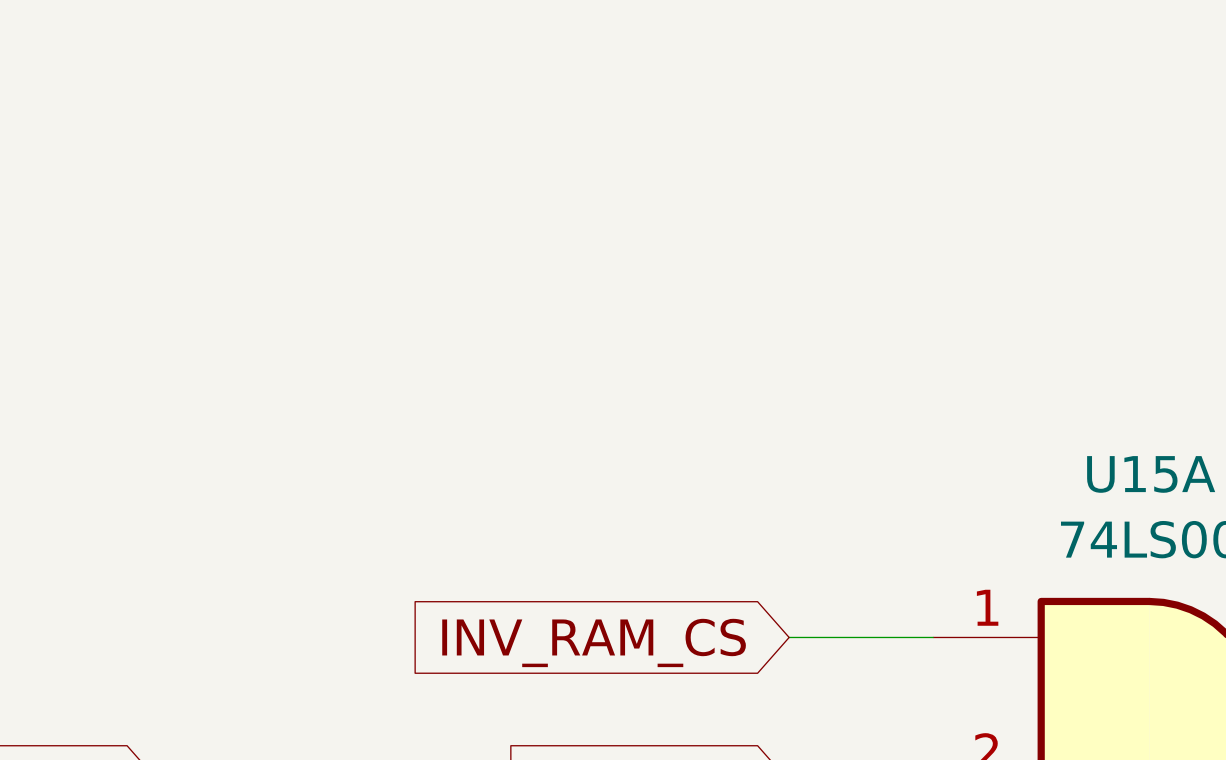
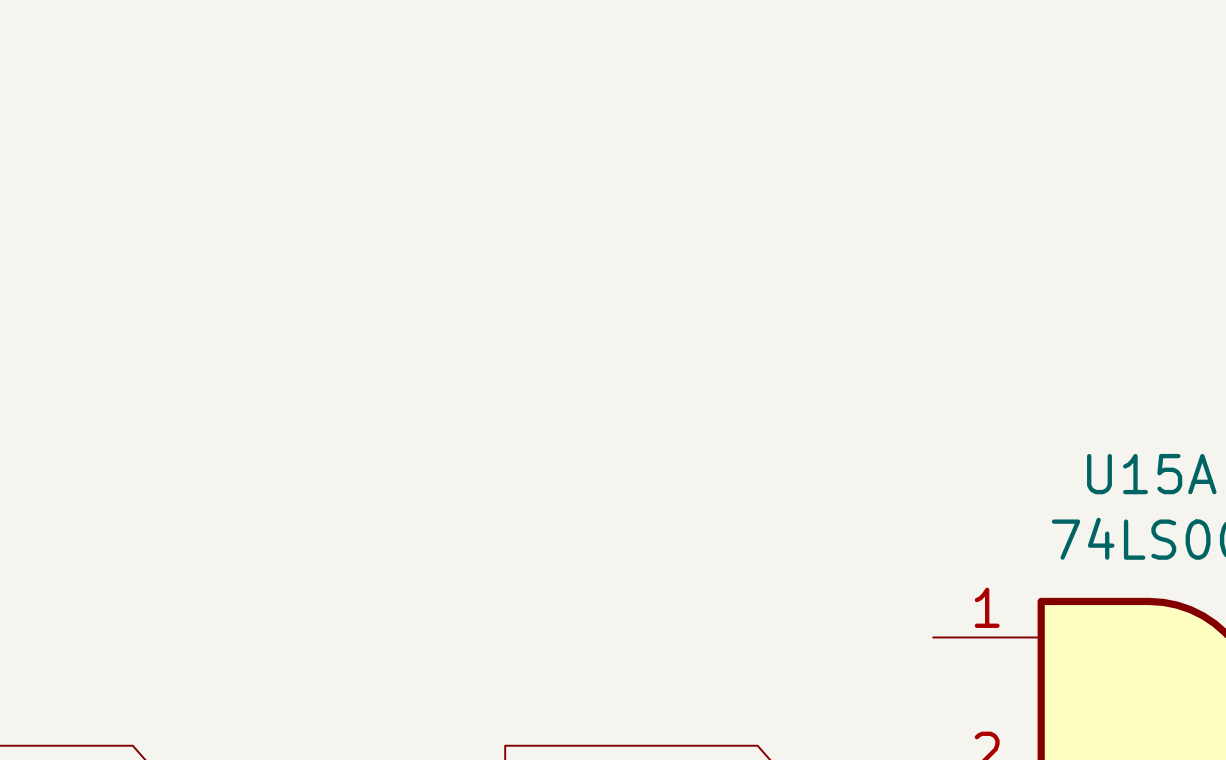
wire: (789, 637) (933, 637) -> none
global label: INV_RAM_CS (594, 642) -> none

